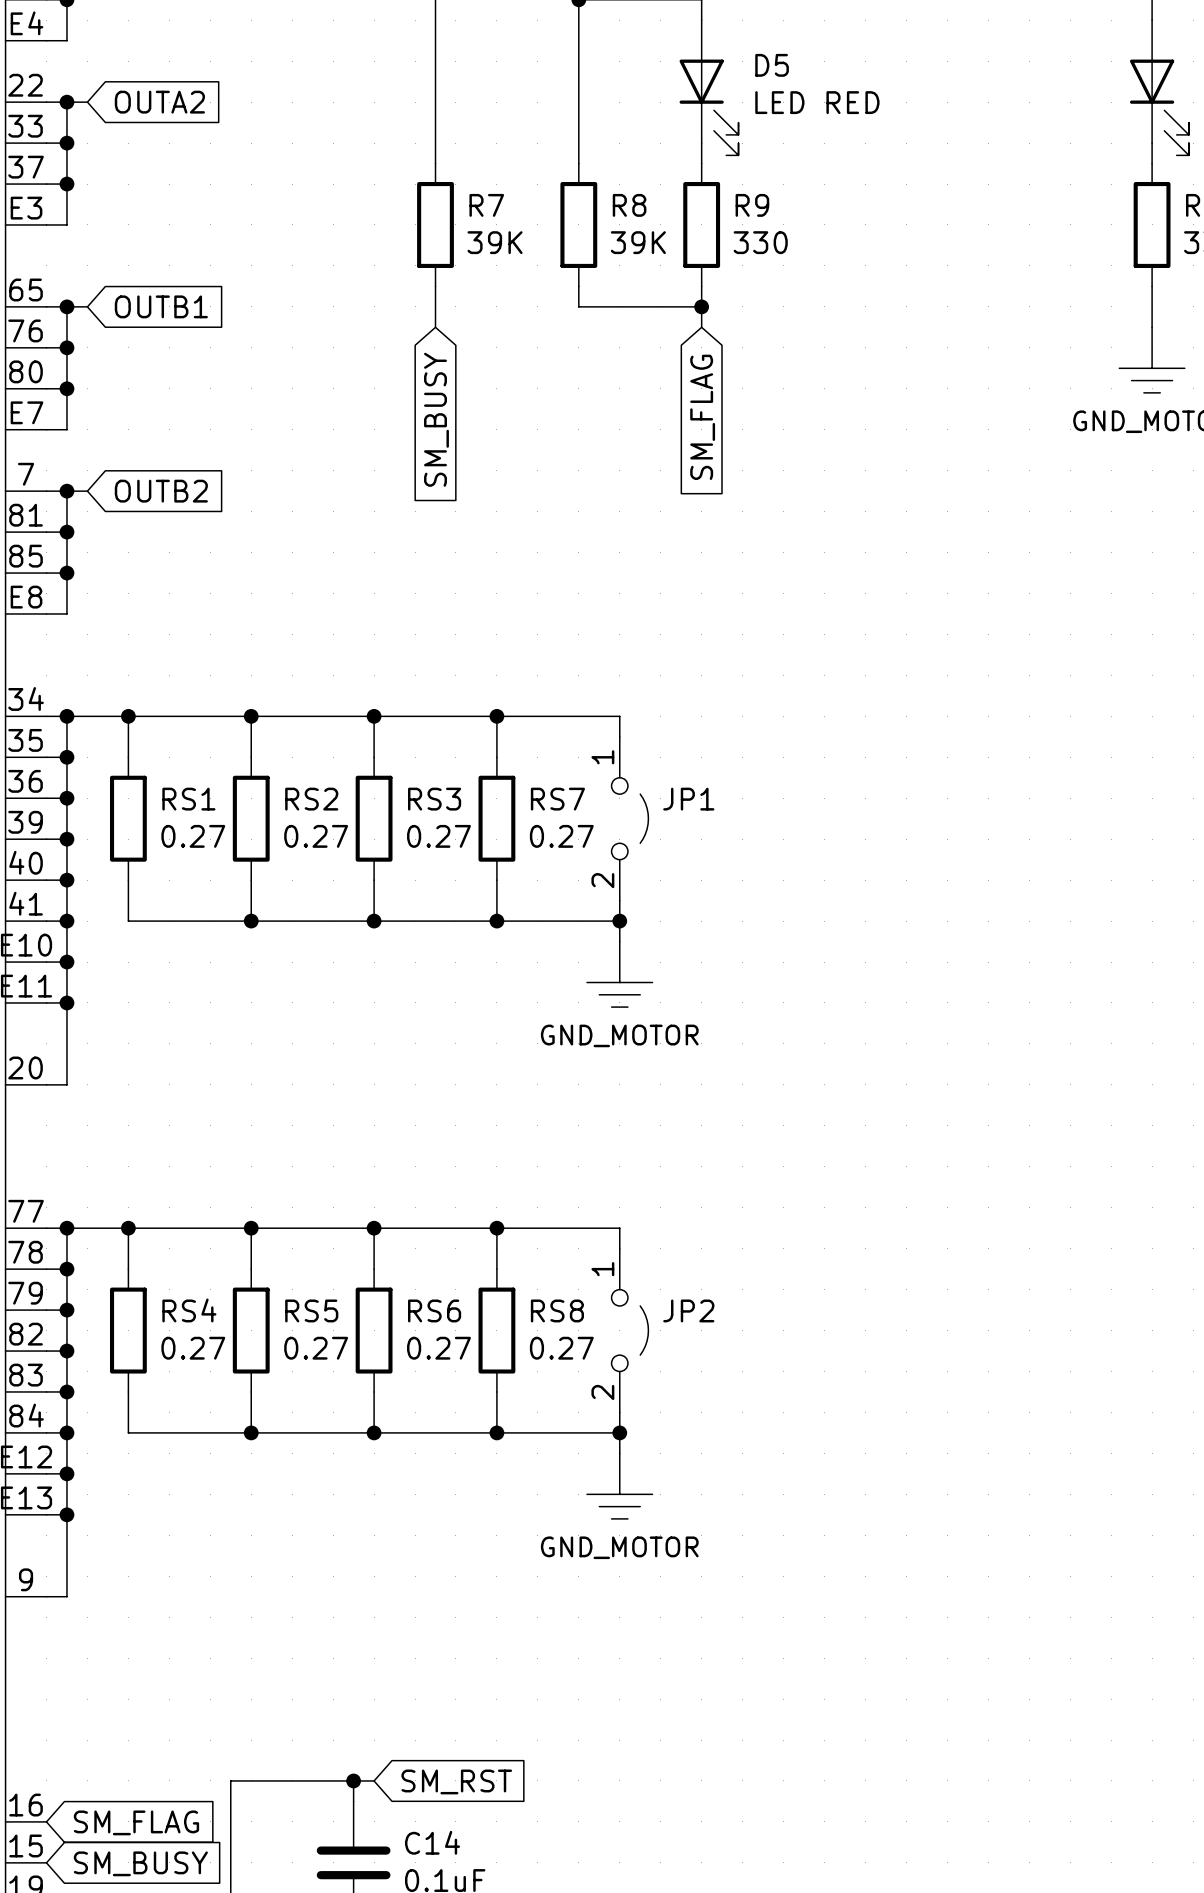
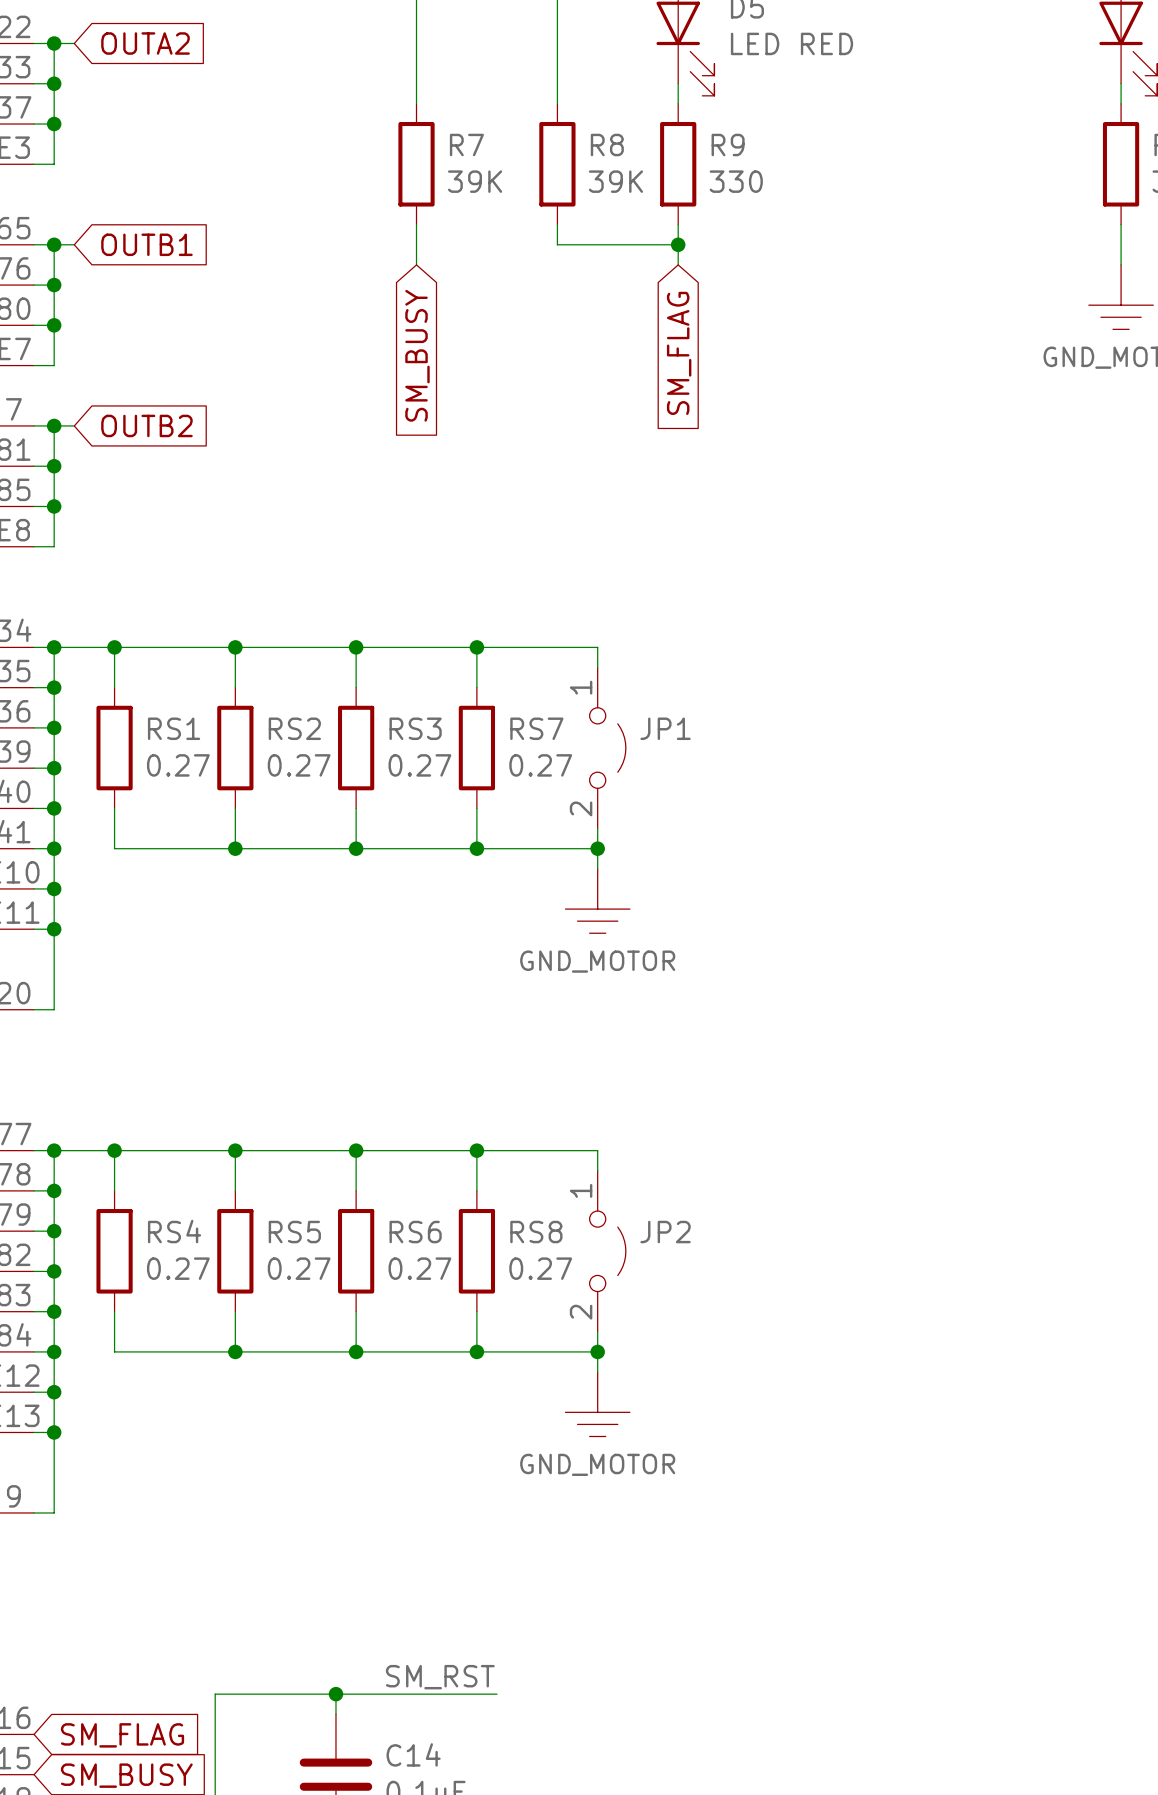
label: none -> SM_RST (440, 1677)
wire: none -> (356, 1694) (497, 1694)
global label: SM_RST (456, 1781) -> none

